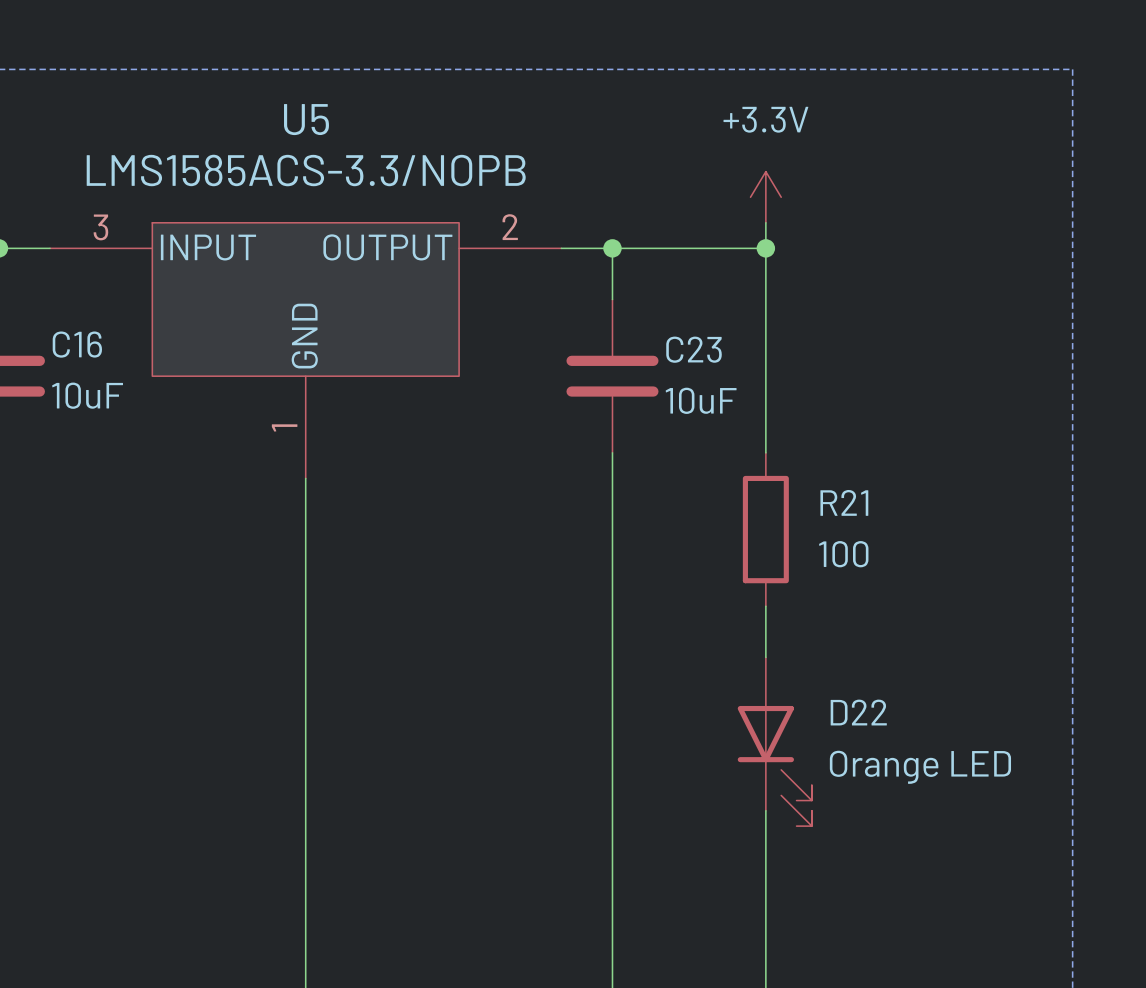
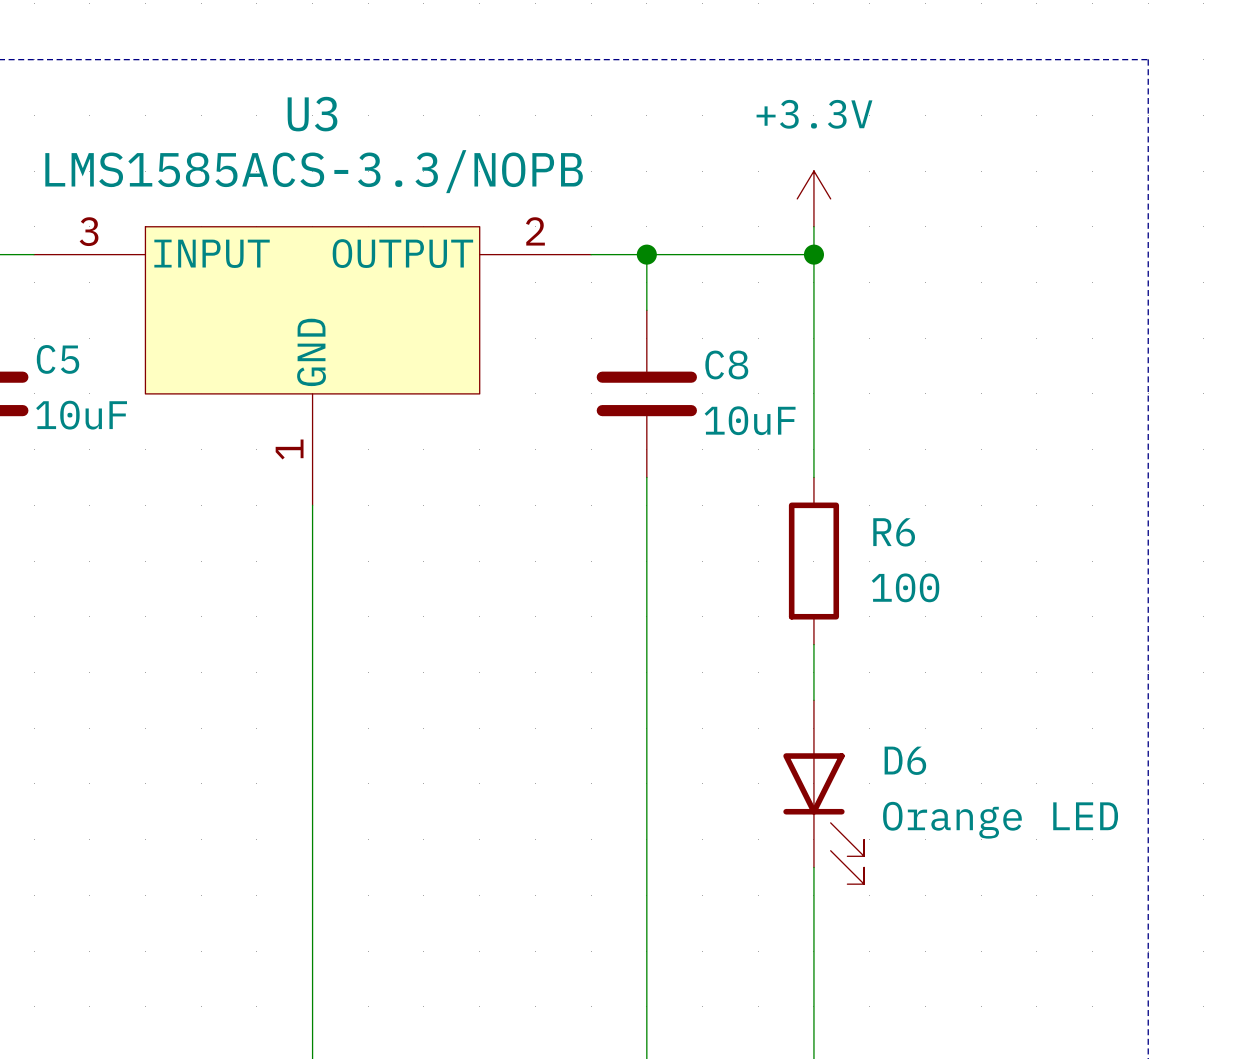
U5 name: U5 (306, 119) -> U3 (312, 114)
C16 name: C16 (77, 344) -> C5 (58, 359)
C23 name: C23 (694, 349) -> C8 (726, 365)
R21 name: R21 (844, 502) -> R6 (894, 532)
D22 name: D22 (858, 712) -> D6 (905, 760)

